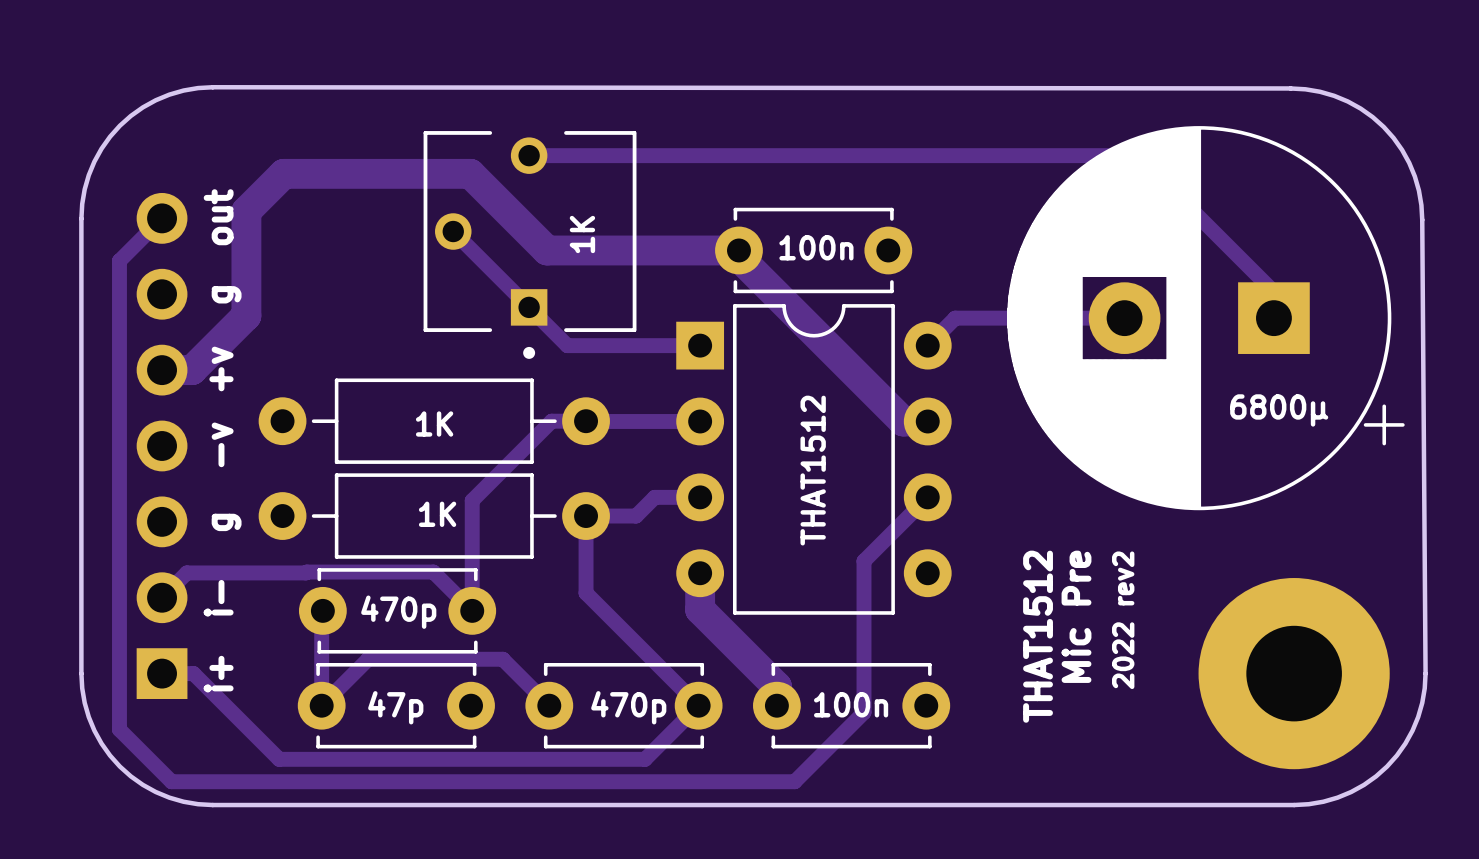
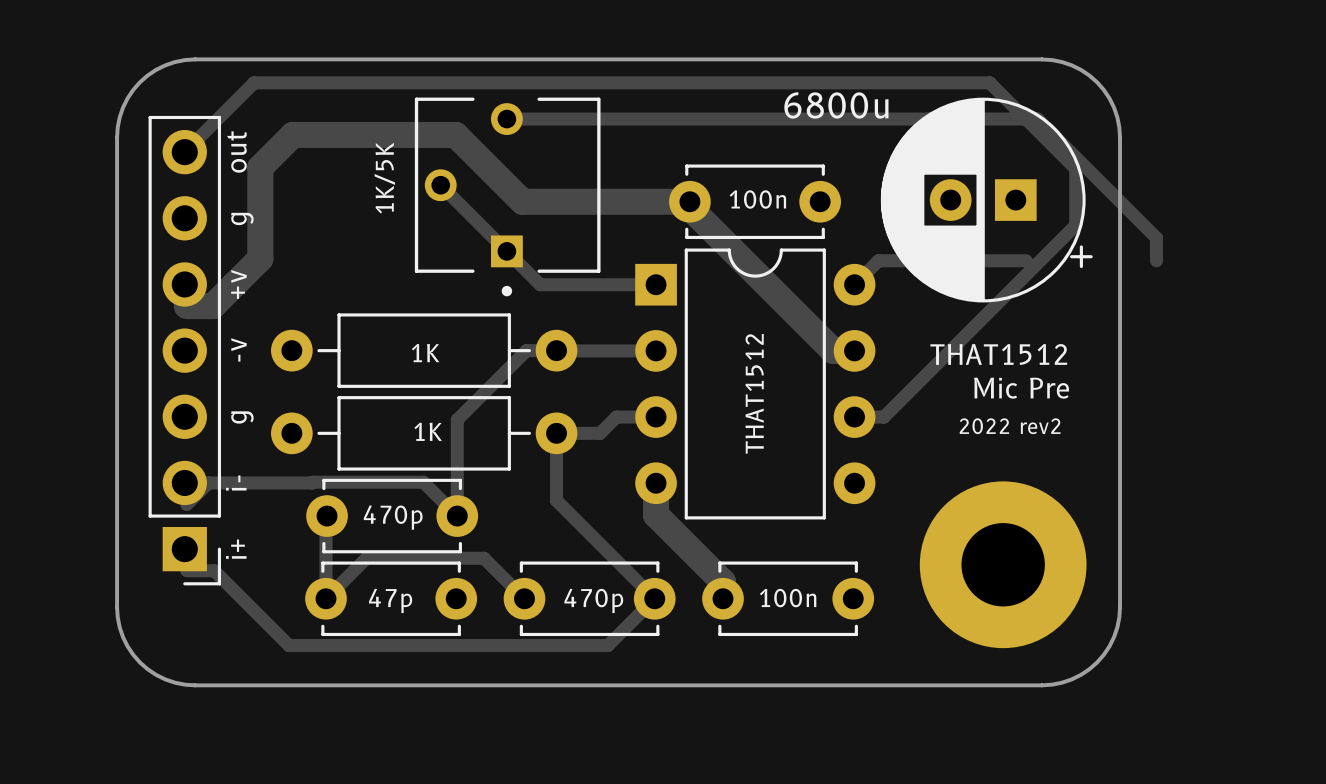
part footprint: [136, 192, 188, 699] -> [148, 115, 222, 586]
text position: out (218, 217) -> out (236, 151)
track: (162, 218) (119, 260) (119, 729) (171, 781) (794, 781) (864, 712) (864, 561) (927, 497) -> (184, 152) (254, 82) (989, 82) (1075, 168) (1075, 225) (884, 417) (854, 417)
part value: 1K (582, 234) -> 1K/5K (384, 178)
part: none -> 6800u (986, 200)
text position: g (226, 294) -> g (242, 218)
part: 6800μ (1205, 318) -> none
text position: +v (221, 368) -> +v (238, 284)
text position: -v (222, 444) -> -v (238, 349)
text position: g (226, 522) -> g (242, 417)
text position: i- (218, 598) -> i- (236, 483)
text rotation: 0° (1076, 616) -> 90° clockwise (1021, 388)
text rotation: 0° (1123, 620) -> 90° clockwise (1010, 426)
text rotation: 0° (1038, 636) -> 90° clockwise (998, 354)
text position: THAT1512 (1038, 636) -> THAT1512 (998, 354)
part position: (1294, 673) -> (1003, 564)
text position: i+ (218, 674) -> i+ (236, 549)
board edge: (212, 805) (183, 801) (169, 797) (142, 784) (119, 766) (101, 743) (94, 730) (84, 702) (82, 688) (82, 203) (88, 175) (101, 148) (119, 125) (142, 107) (169, 94) (183, 90) (212, 87) (1290, 88) (1320, 91) (1347, 101) (1372, 117) (1383, 126) (1402, 149) (1409, 162) (1418, 190) (1421, 205) (1425, 673) (1422, 702) (1412, 730) (1396, 755) (1387, 766) (1364, 784) (1337, 797) (1323, 801) (1294, 805) (1142, 804) -> (231, 685) (185, 684) (165, 679) (147, 669) (127, 646) (119, 627) (117, 607) (117, 127) (123, 107) (139, 82) (165, 65) (195, 59) (1041, 59) (1071, 65) (1089, 75) (1109, 98) (1117, 117) (1120, 137) (1119, 617) (1109, 646) (1097, 662) (1071, 679) (1041, 685)

